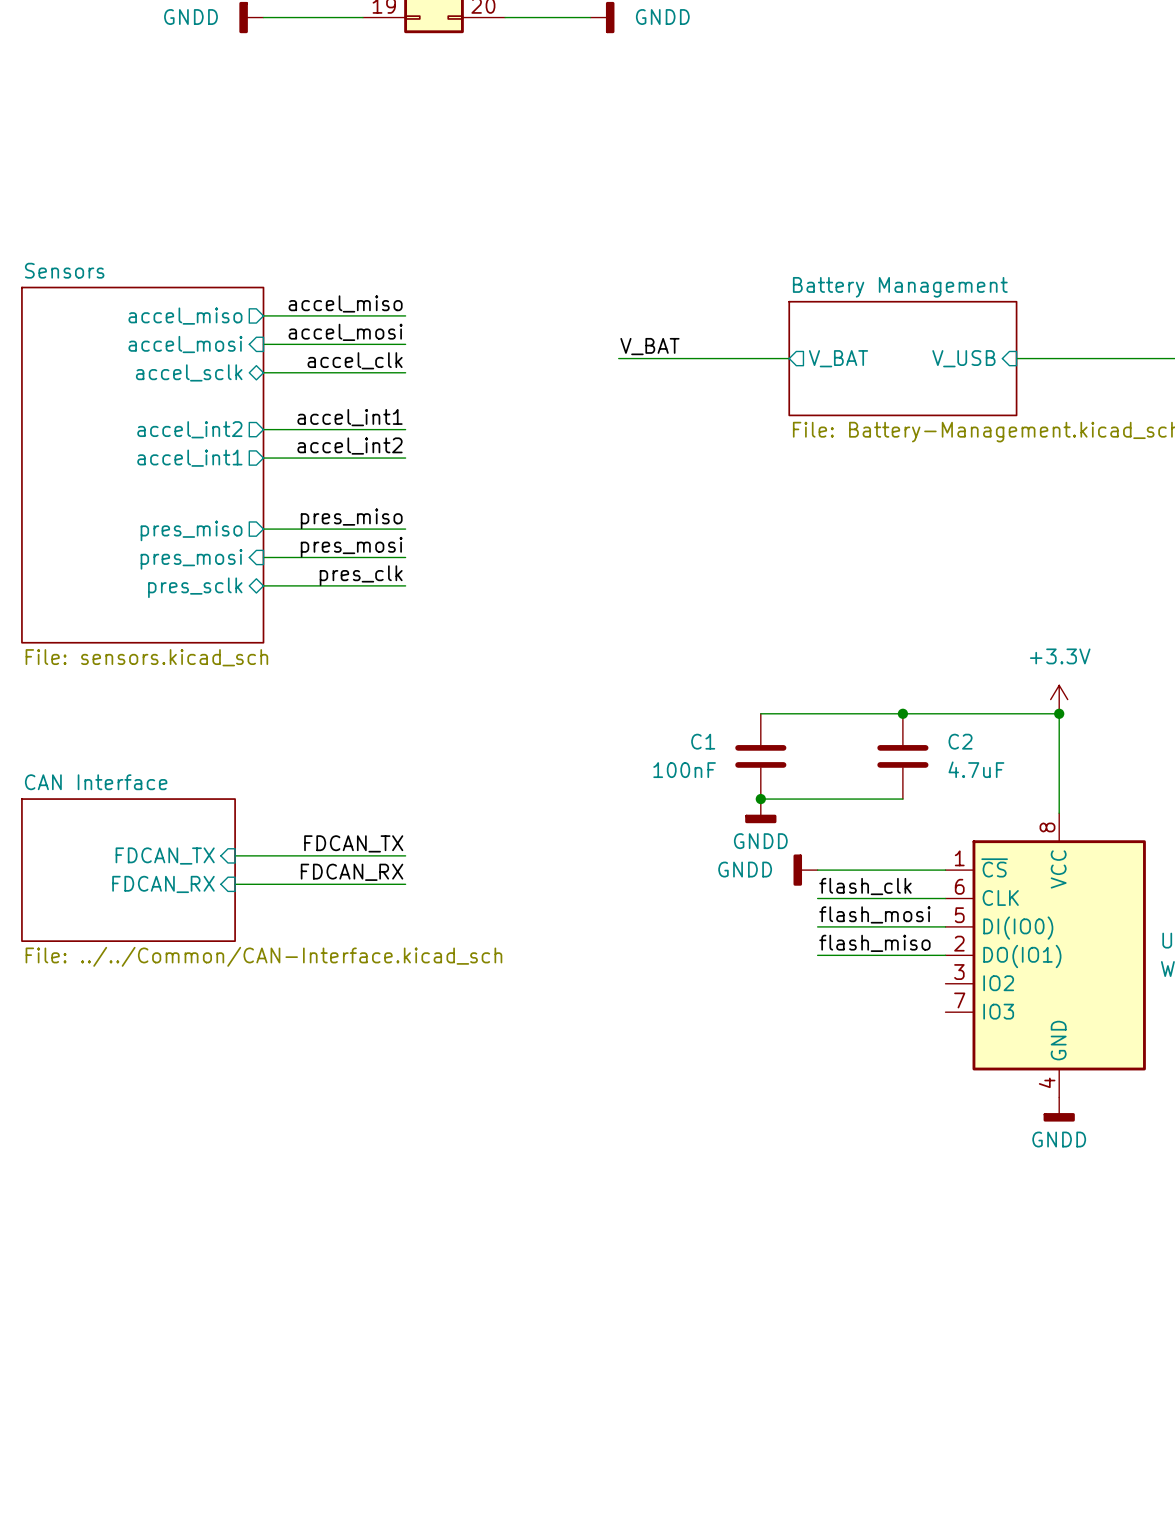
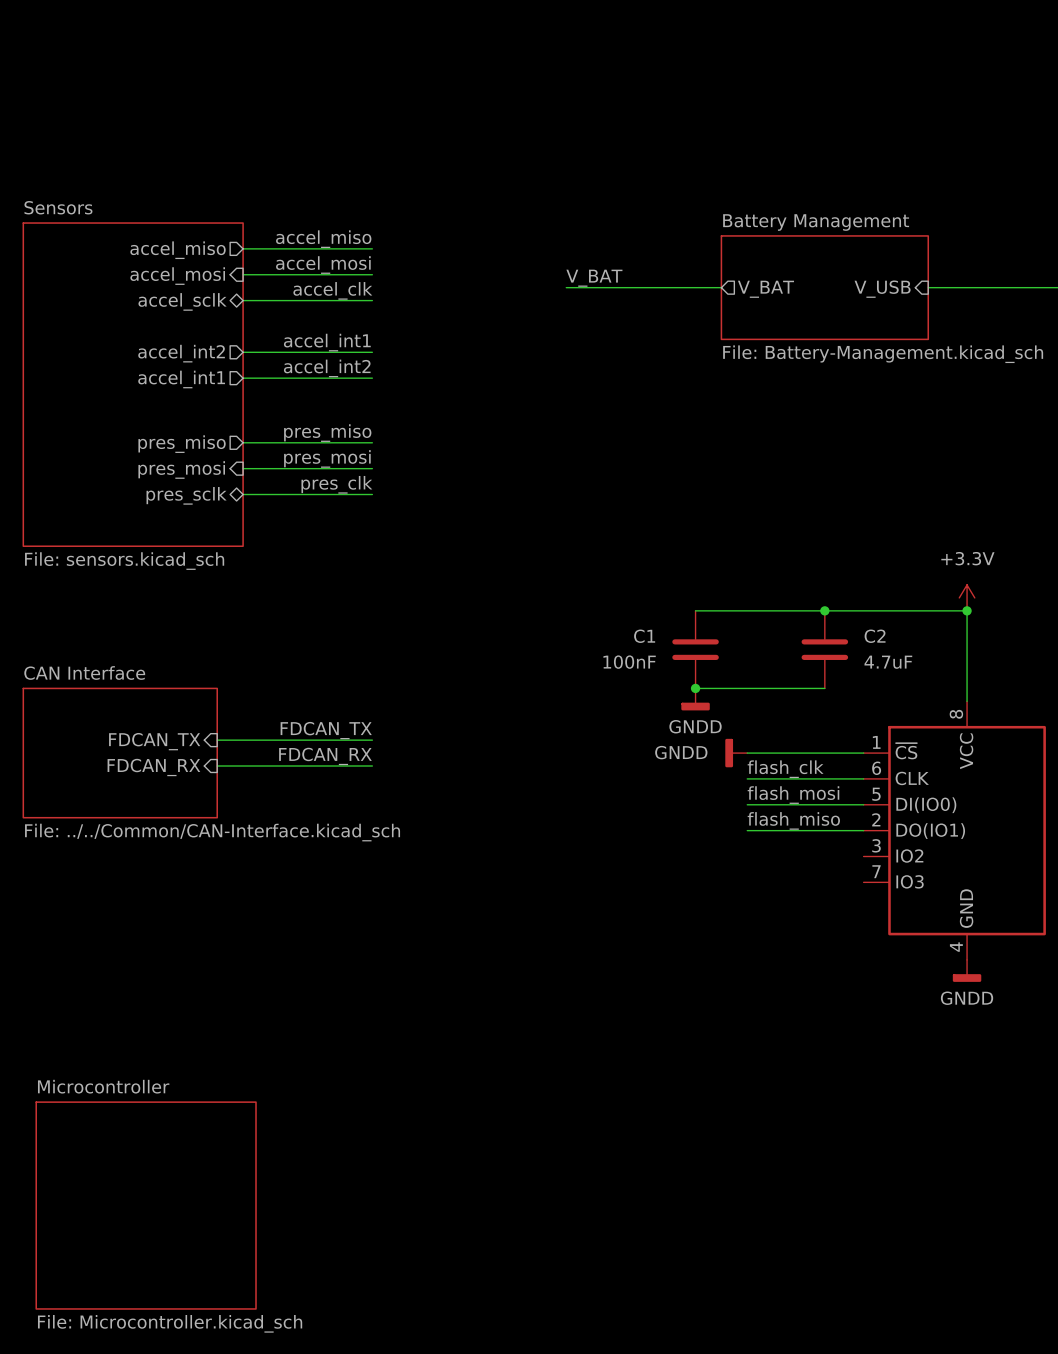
sheet Microcontroller: none -> File: Microcontroller.kicad_sch (146, 1205)

